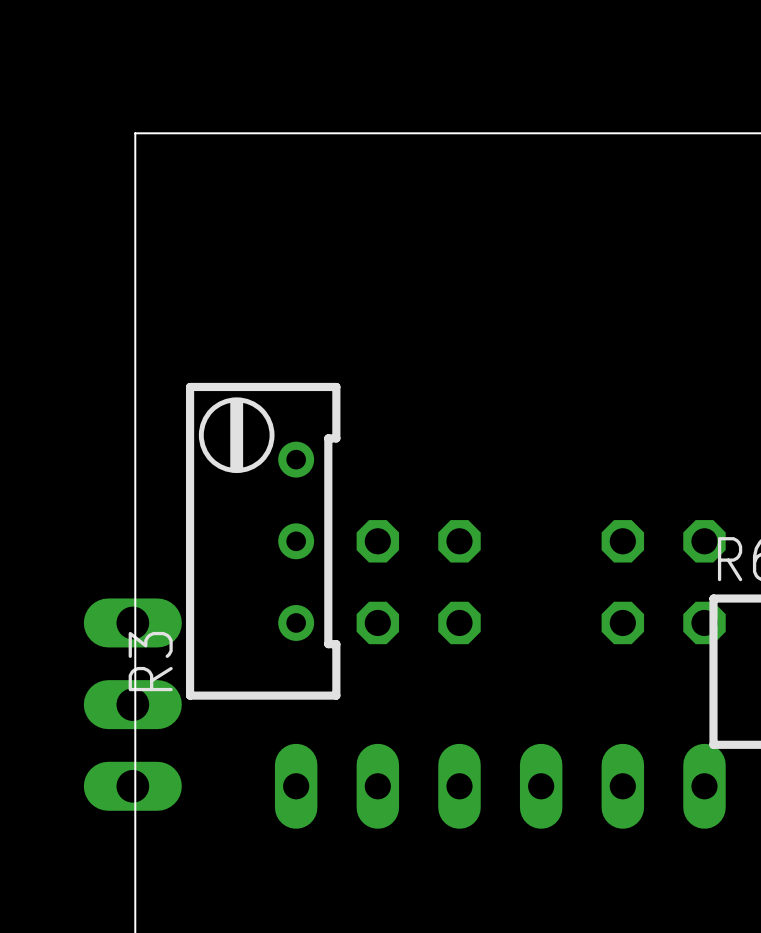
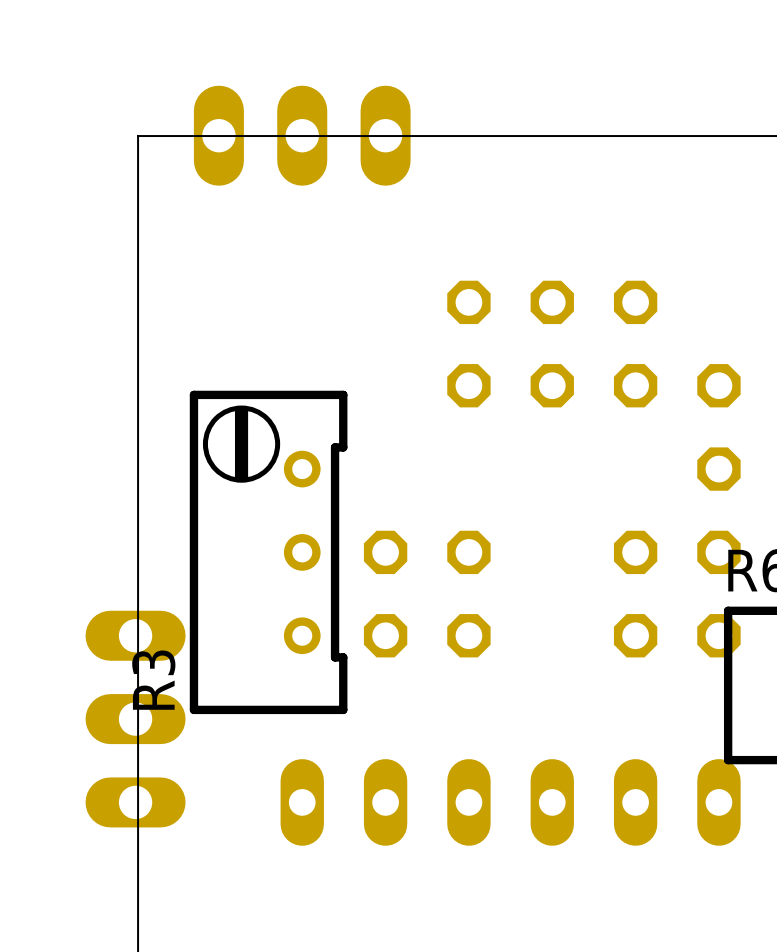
part: none -> (302, 135)
part: none -> (593, 302)
part: none -> (468, 344)
part: none -> (593, 385)
part: none -> (718, 427)

